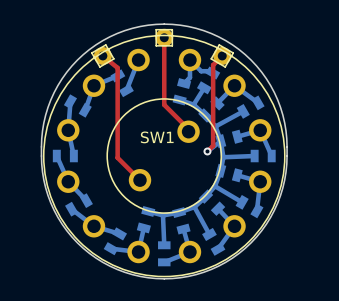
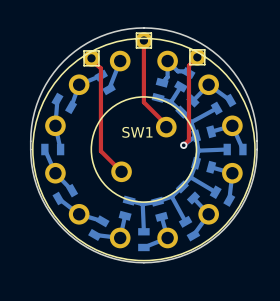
part rotation: 0° (102, 55) -> 30° clockwise (91, 58)
part rotation: 0° (222, 55) -> 30° counterclockwise (197, 57)

